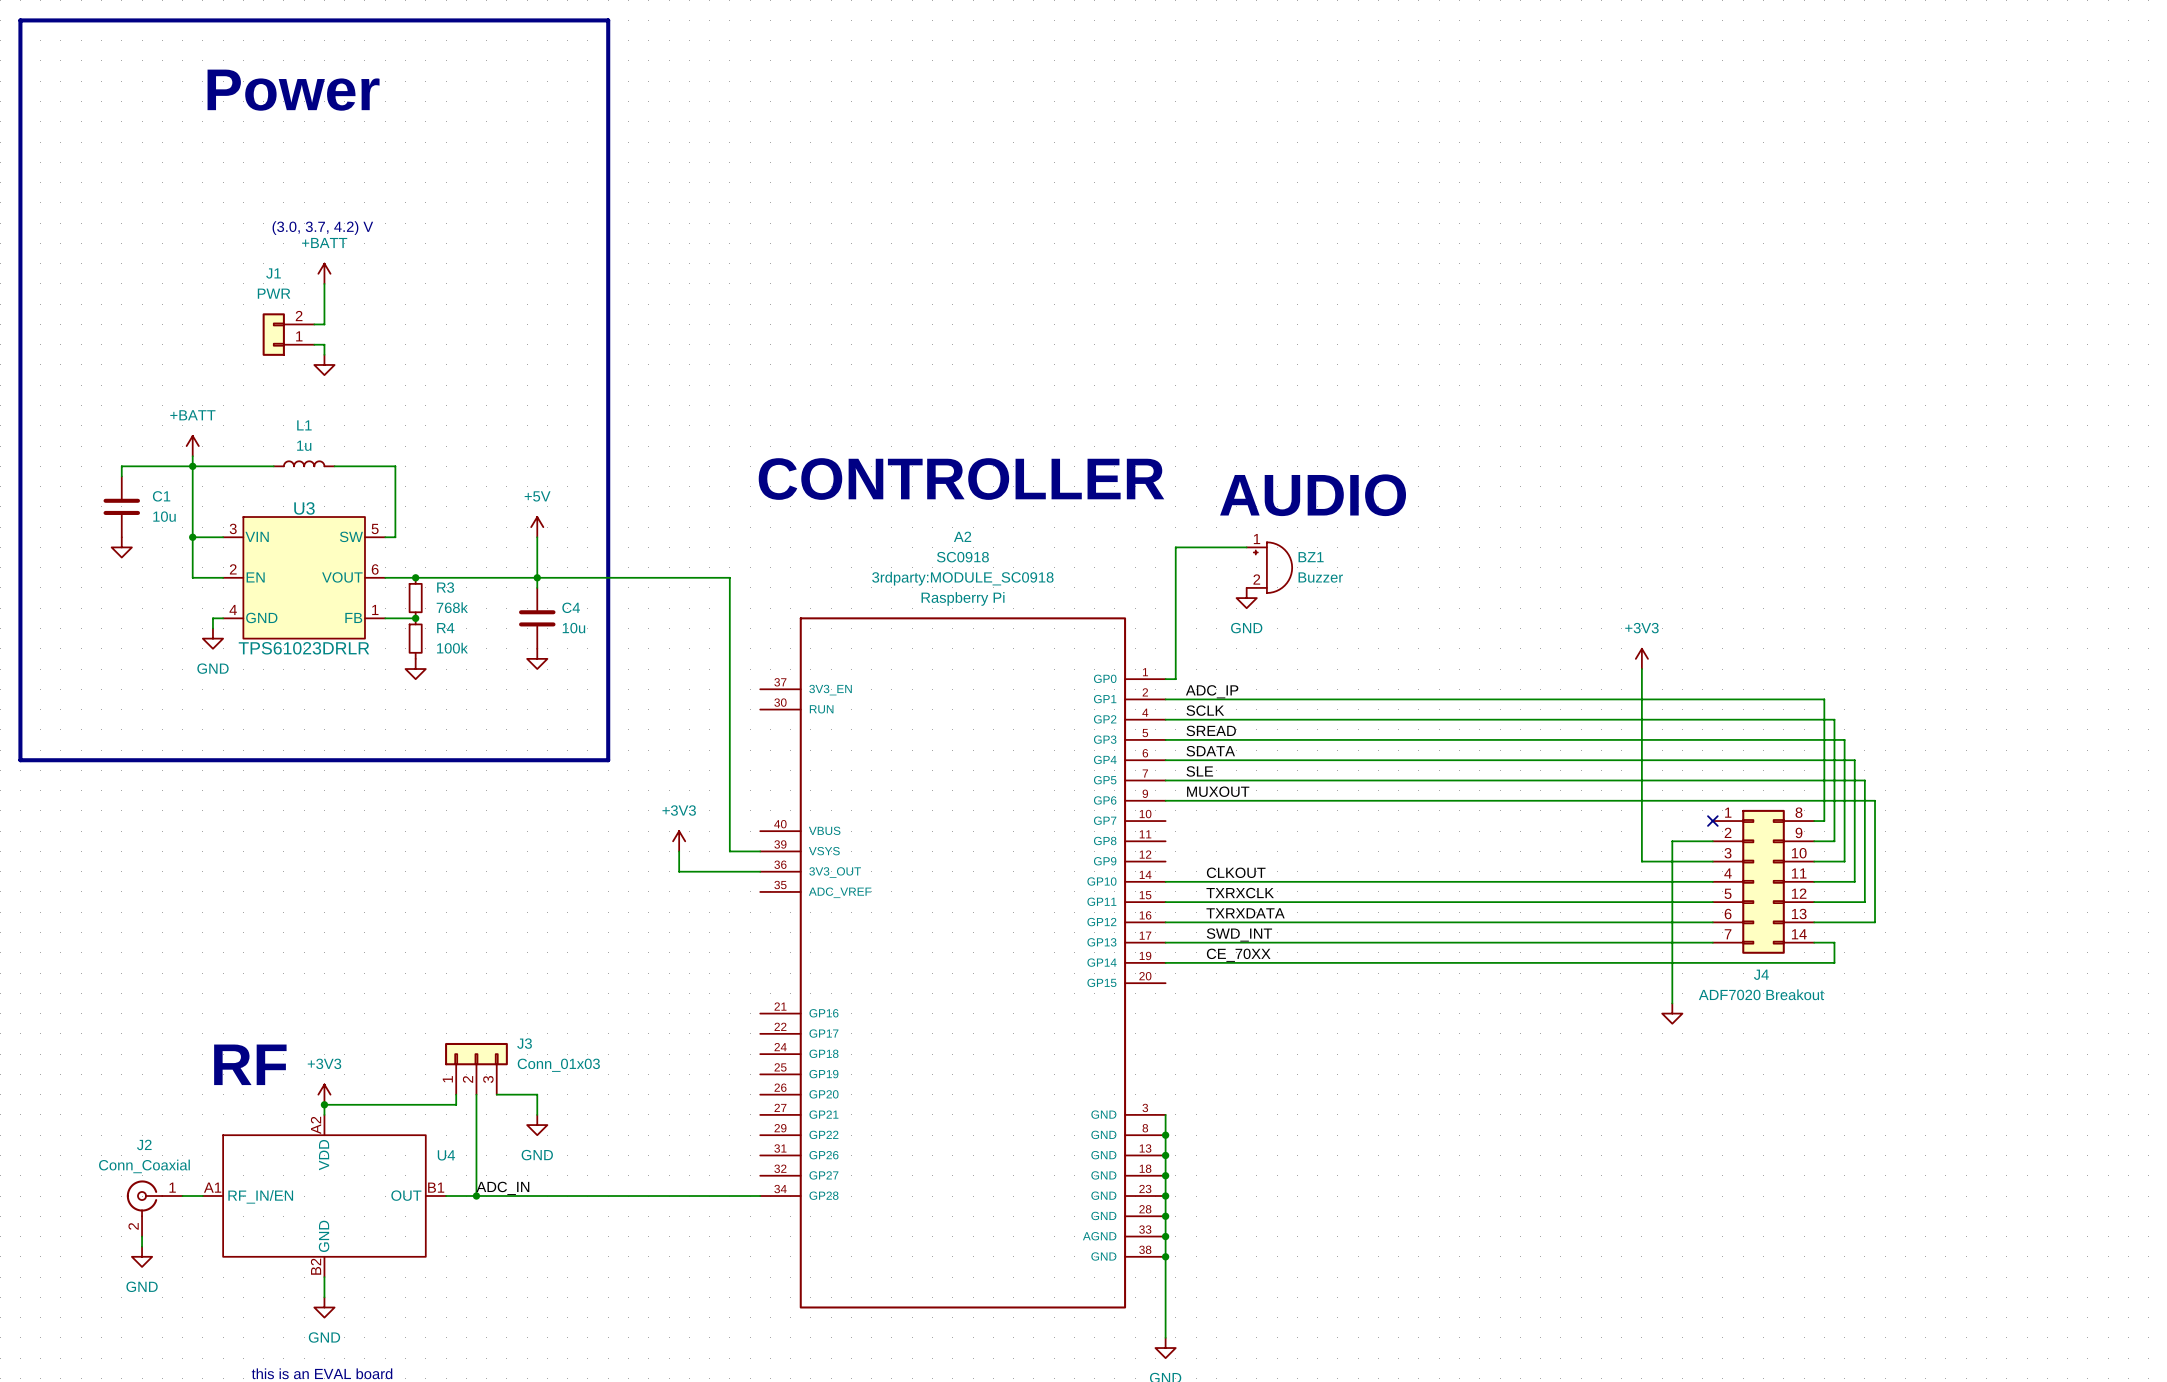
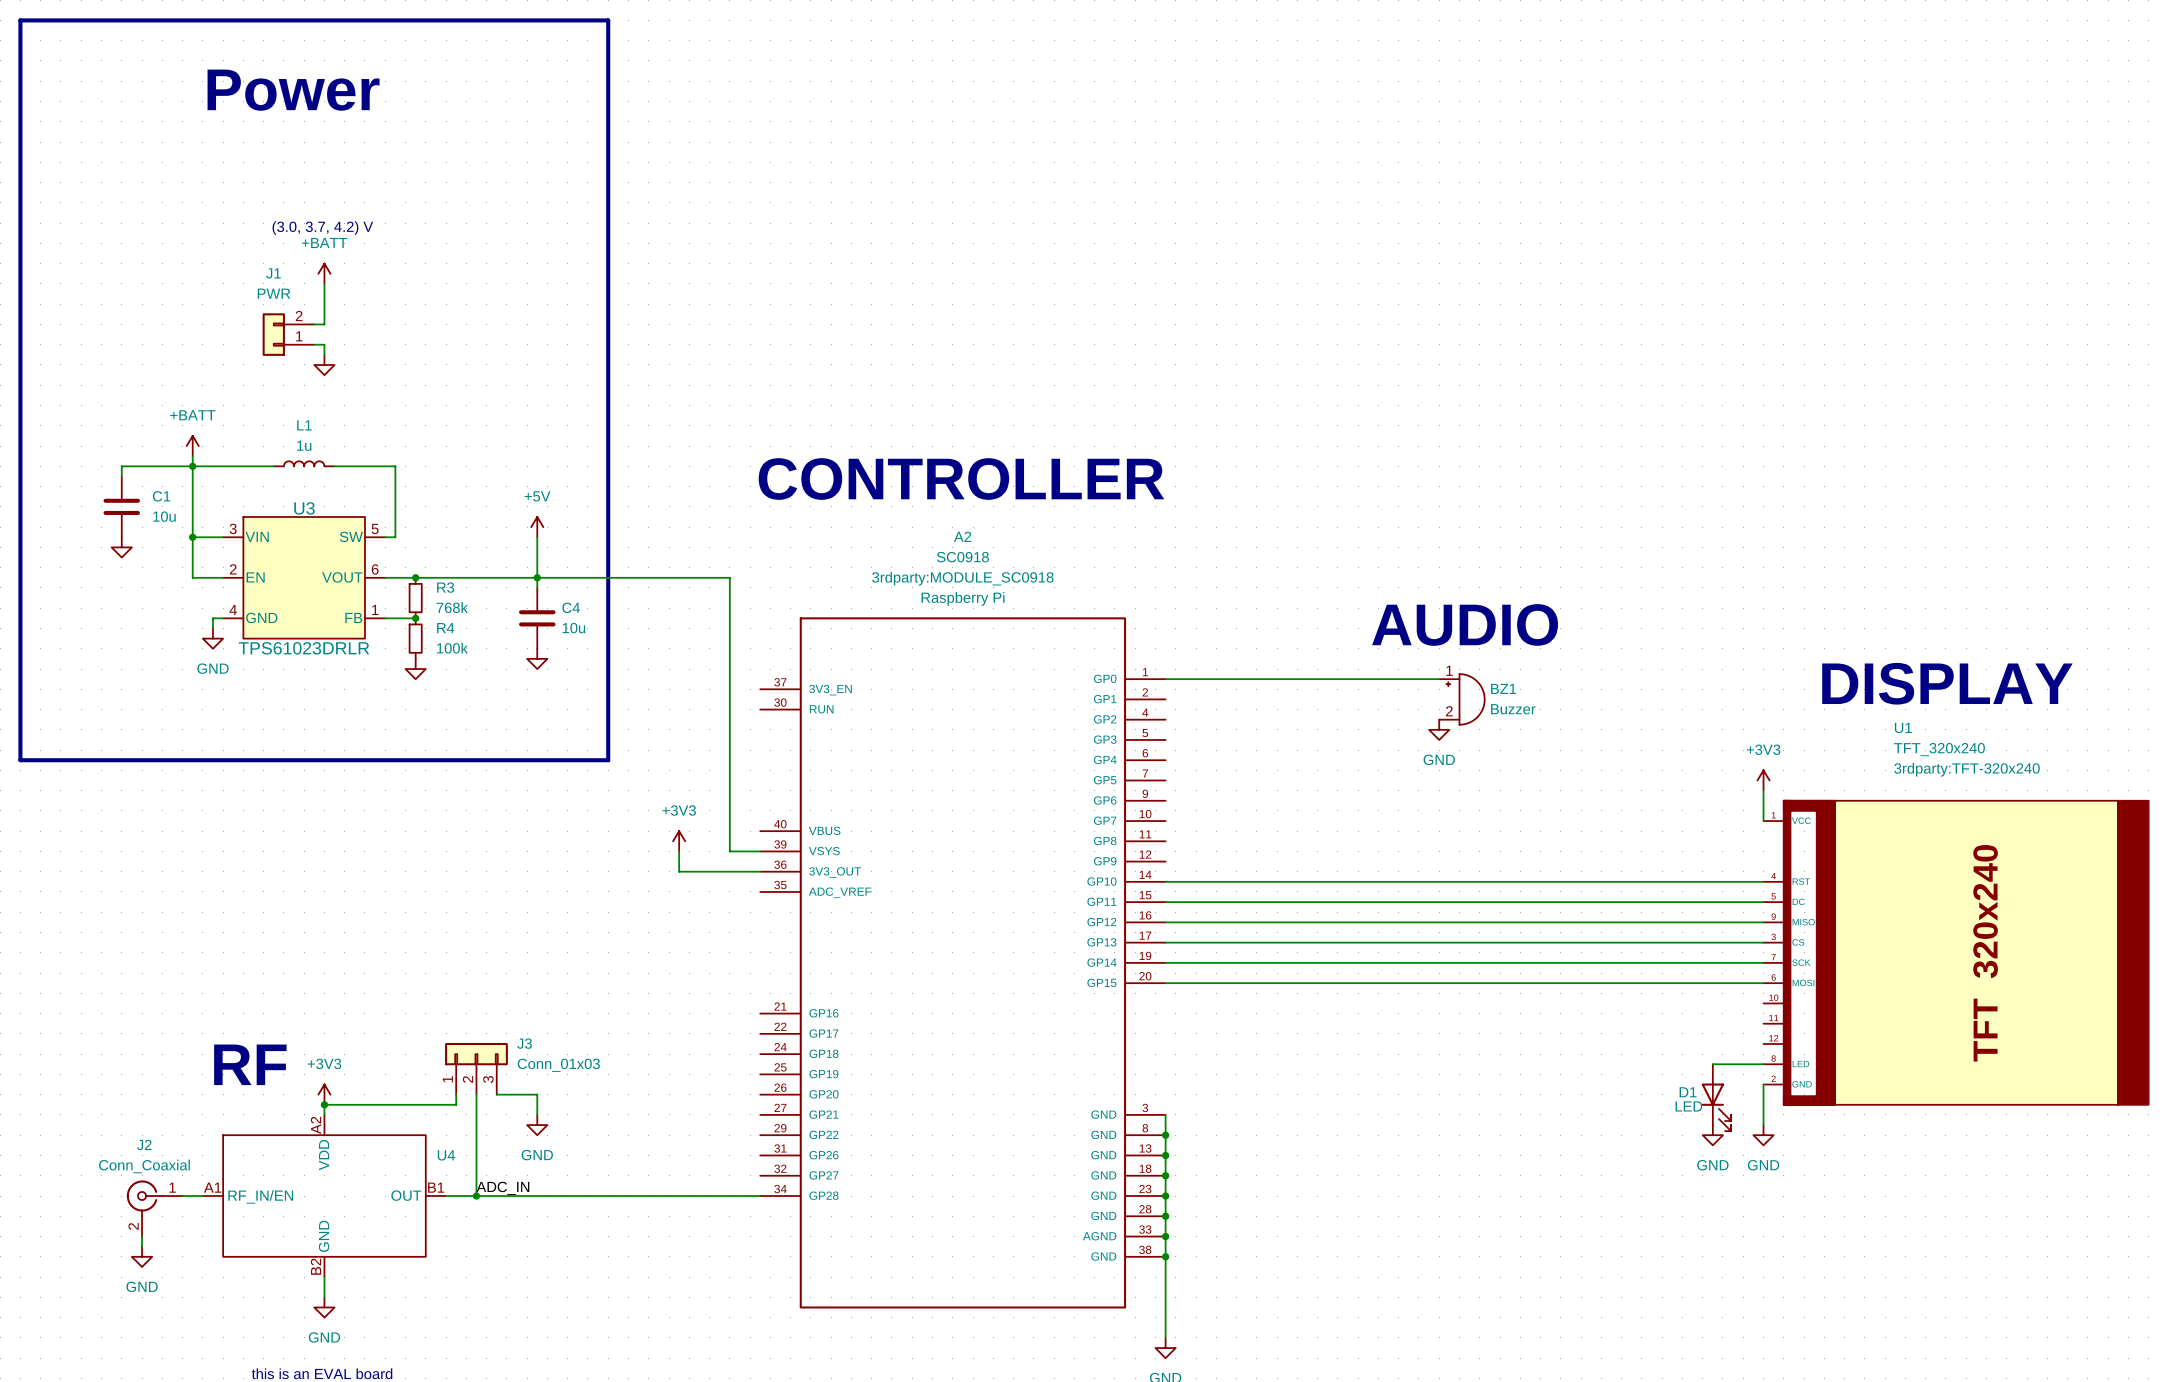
text: AUDIO (1313, 495) -> none
wire: (1246, 547) (1175, 547) (1175, 679) -> (1439, 679) (1175, 679)
BZ1 position: (1269, 567) -> (1461, 699)
power symbol: GND (1246, 598) -> none
text: none -> AUDIO (1465, 624)
power symbol position: +3V3 (1641, 658) -> +3V3 (1763, 780)
wire: (1641, 669) (1641, 861) (1712, 861) -> none
text: none -> DISPLAY (1947, 683)
label: ADC_IP (1212, 691) -> none
wire: (1165, 699) (1824, 699) (1824, 821) (1814, 821) -> none
label: SCLK (1205, 710) -> none
wire: (1165, 719) (1834, 719) (1834, 841) (1814, 841) -> none
power symbol: none -> GND (1439, 729)
label: SREAD (1211, 730) -> none
wire: (1165, 739) (1844, 739) (1844, 861) (1814, 861) -> none
label: SDATA (1210, 751) -> none
wire: (1165, 760) (1854, 760) (1854, 881) (1814, 881) -> none
label: SLE (1199, 771) -> none
wire: (1165, 780) (1864, 780) (1864, 902) (1814, 902) -> none
wire: none -> (1763, 790) (1763, 821)
label: MUXOUT (1218, 791) -> none
wire: (1165, 800) (1875, 800) (1875, 922) (1814, 922) -> none
no-connect mark: (1712, 821) -> none
wire: (1712, 841) (1672, 841) (1672, 1003) -> none
label: CLKOUT (1236, 872) -> none
J4: ADF7020 Breakout (1763, 881) -> none
label: TXRXCLK (1240, 893) -> none
label: TXRXDATA (1245, 913) -> none
label: SWD_INT (1239, 934) -> none
U1: none -> TFT_320x240 (1956, 952)
label: CE_70XX (1238, 955) -> none
wire: none -> (1165, 983) (1763, 983)
power symbol: (1672, 1013) -> none
wire: none -> (1712, 1064) (1763, 1064)
wire: none -> (1763, 1084) (1763, 1125)
D1: none -> LED (1716, 1097)
power symbol: none -> GND (1712, 1135)
power symbol: none -> GND (1763, 1135)

